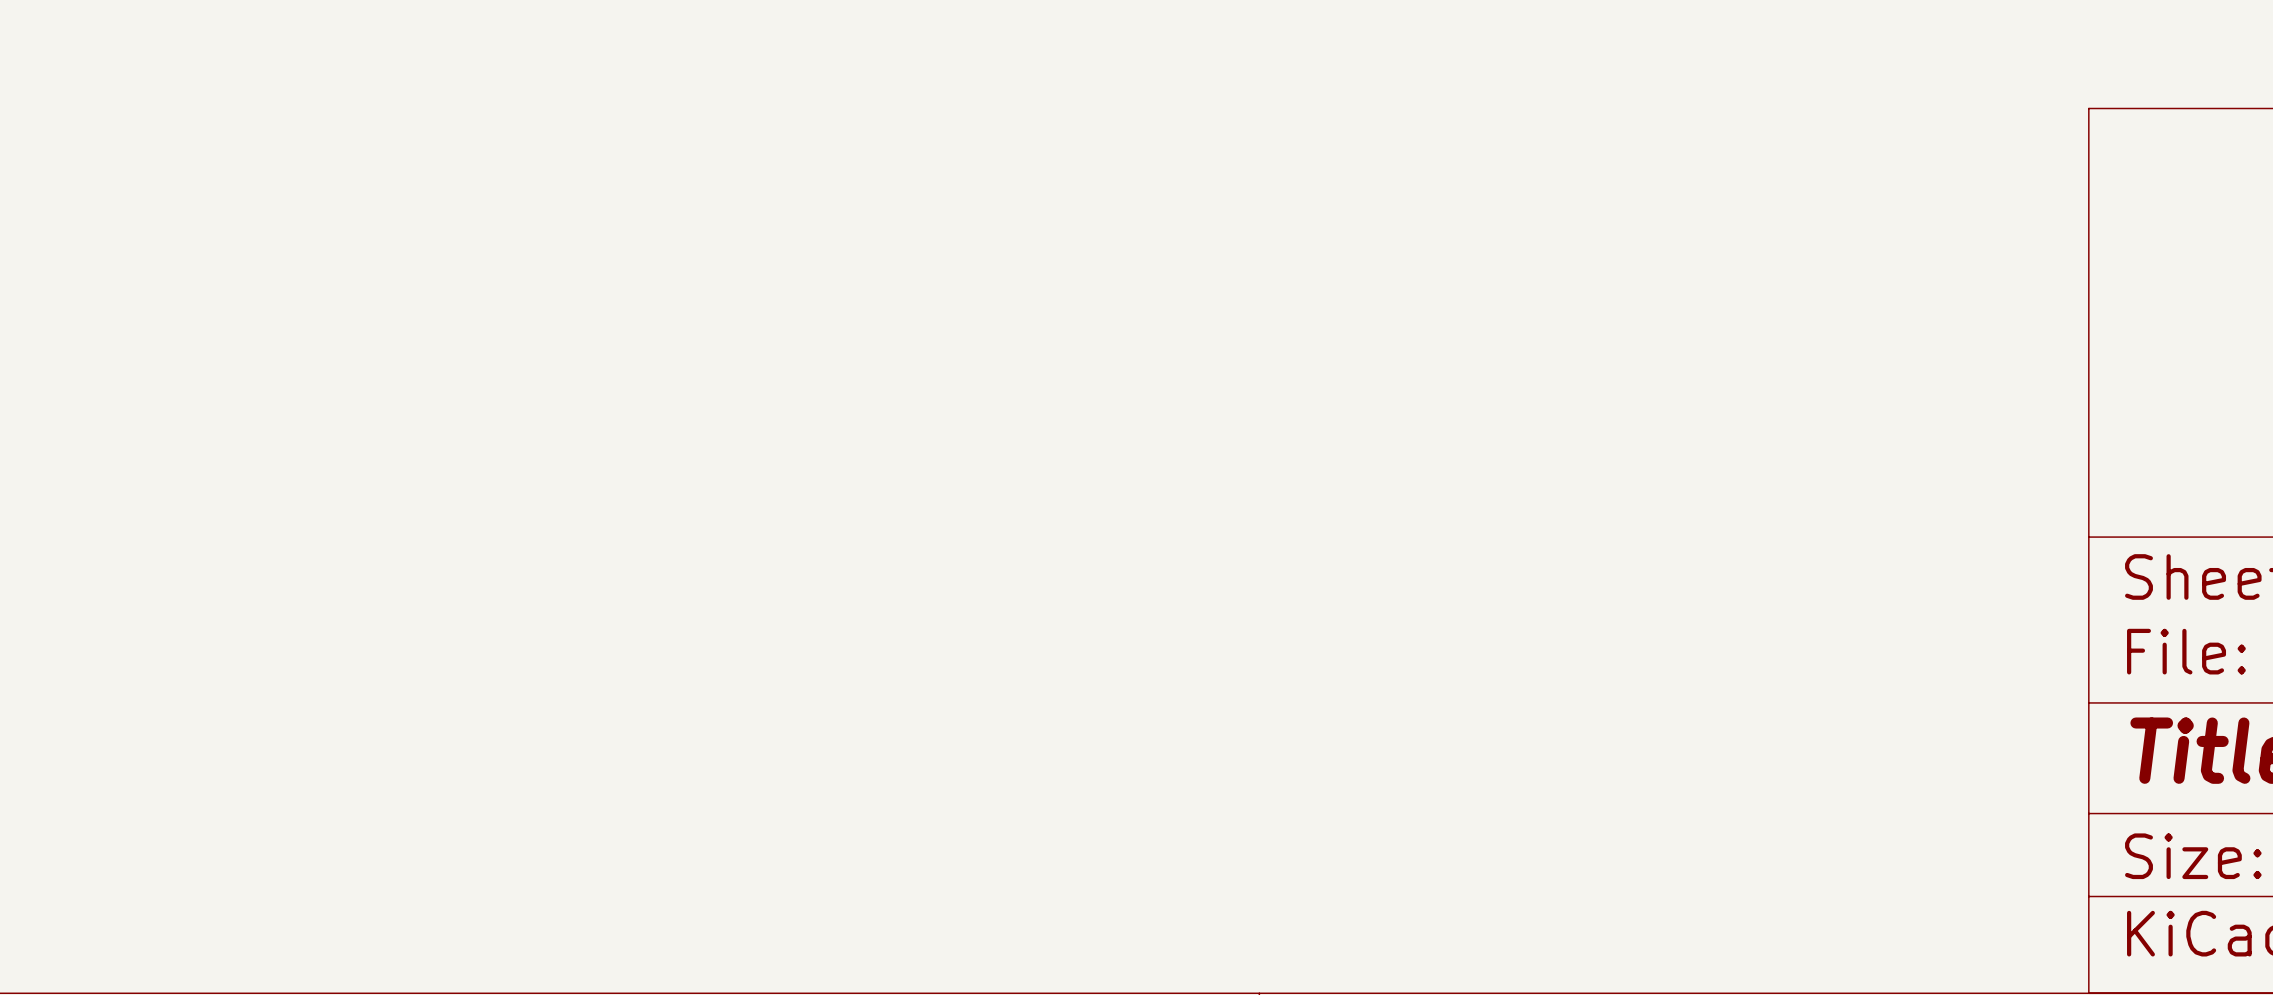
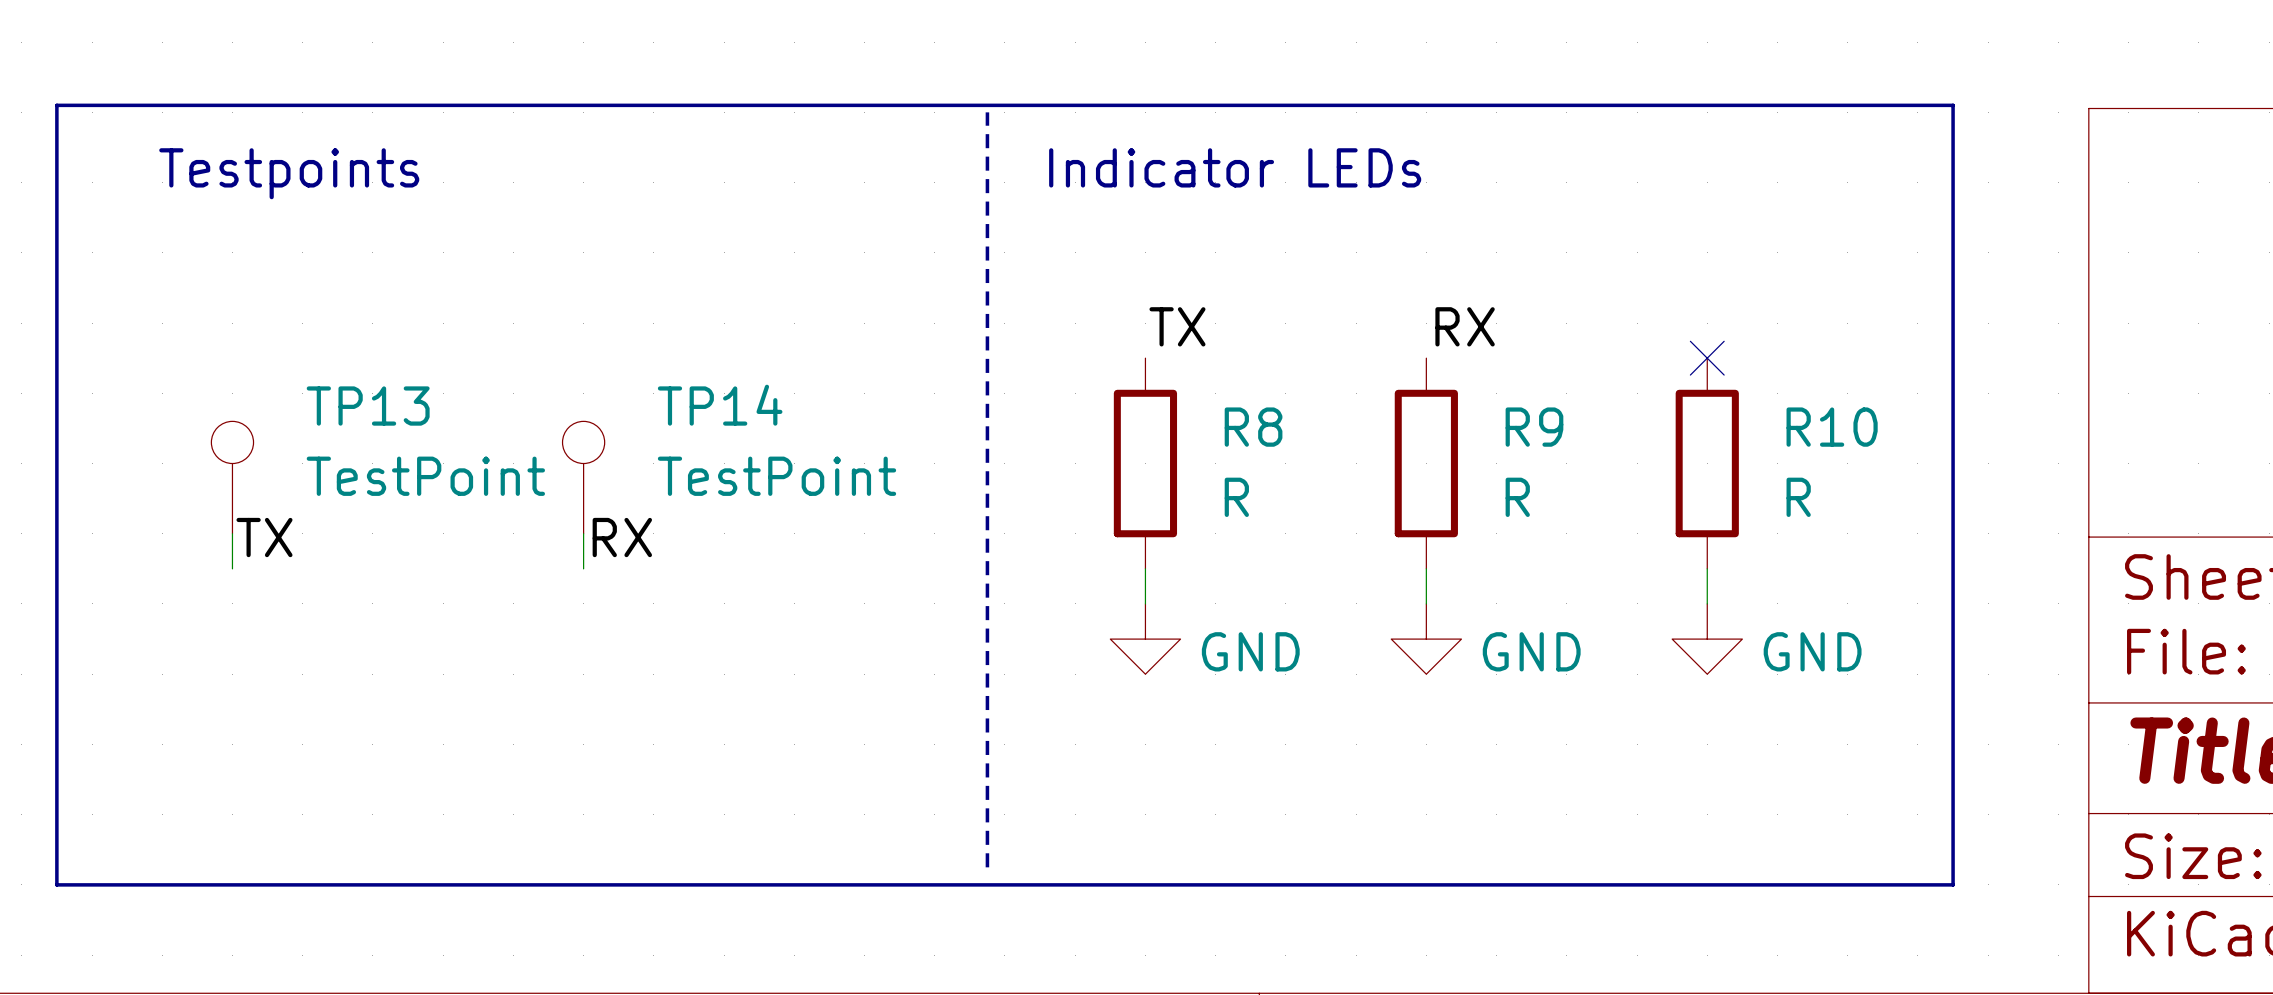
line: none -> (56, 105) (56, 884) (1953, 884) (1953, 105) (56, 105)
line: none -> (987, 112) (987, 867)
text: none -> Indicator LEDs (1235, 167)
text: none -> Testpoints (289, 173)
label: none -> TX (1177, 326)
label: none -> RX (1465, 326)
no-connect mark: none -> (1707, 358)
R8: none -> R (1145, 463)
R9: none -> R (1426, 463)
R10: none -> R (1707, 463)
TP13: none -> TestPoint (232, 477)
TP14: none -> TestPoint (583, 477)
wire: none -> (232, 533) (232, 568)
wire: none -> (583, 533) (583, 568)
label: none -> TX (264, 537)
label: none -> RX (622, 537)
wire: none -> (1145, 568) (1145, 603)
wire: none -> (1426, 568) (1426, 603)
wire: none -> (1707, 568) (1707, 603)
power symbol: none -> GND (1145, 639)
power symbol: none -> GND (1426, 639)
power symbol: none -> GND (1707, 639)

